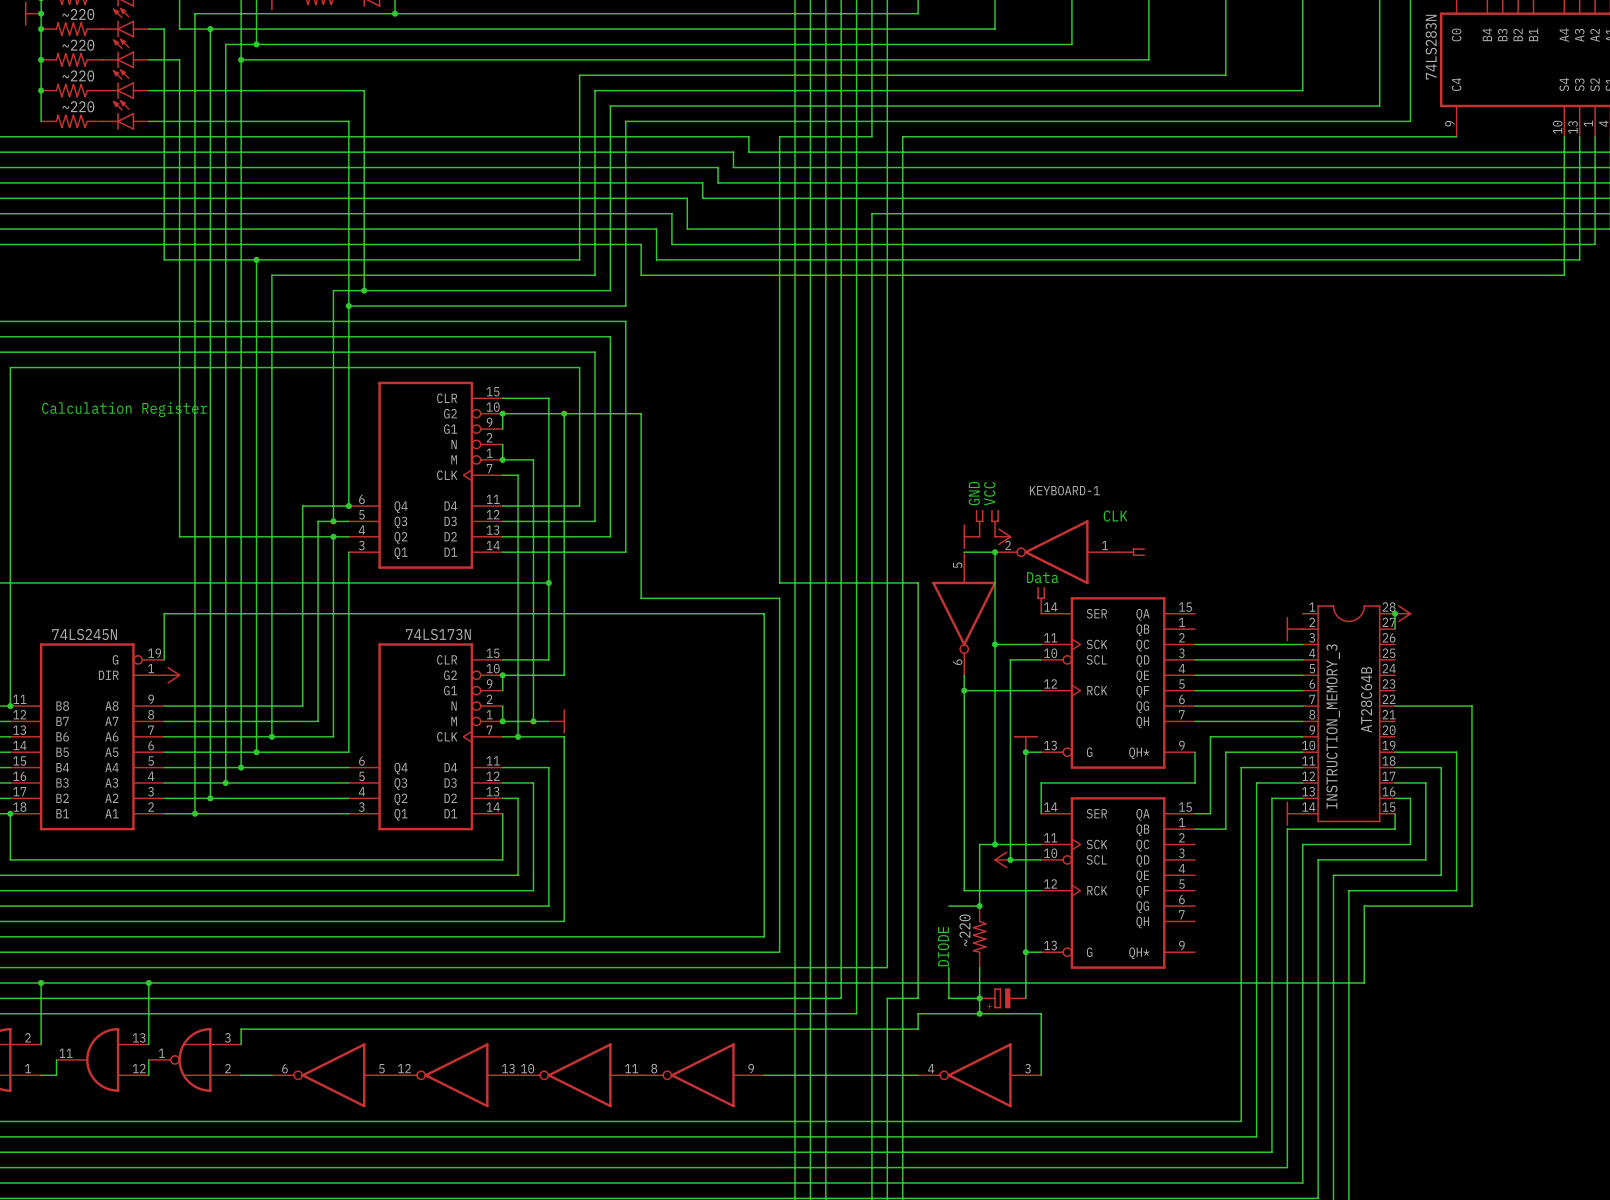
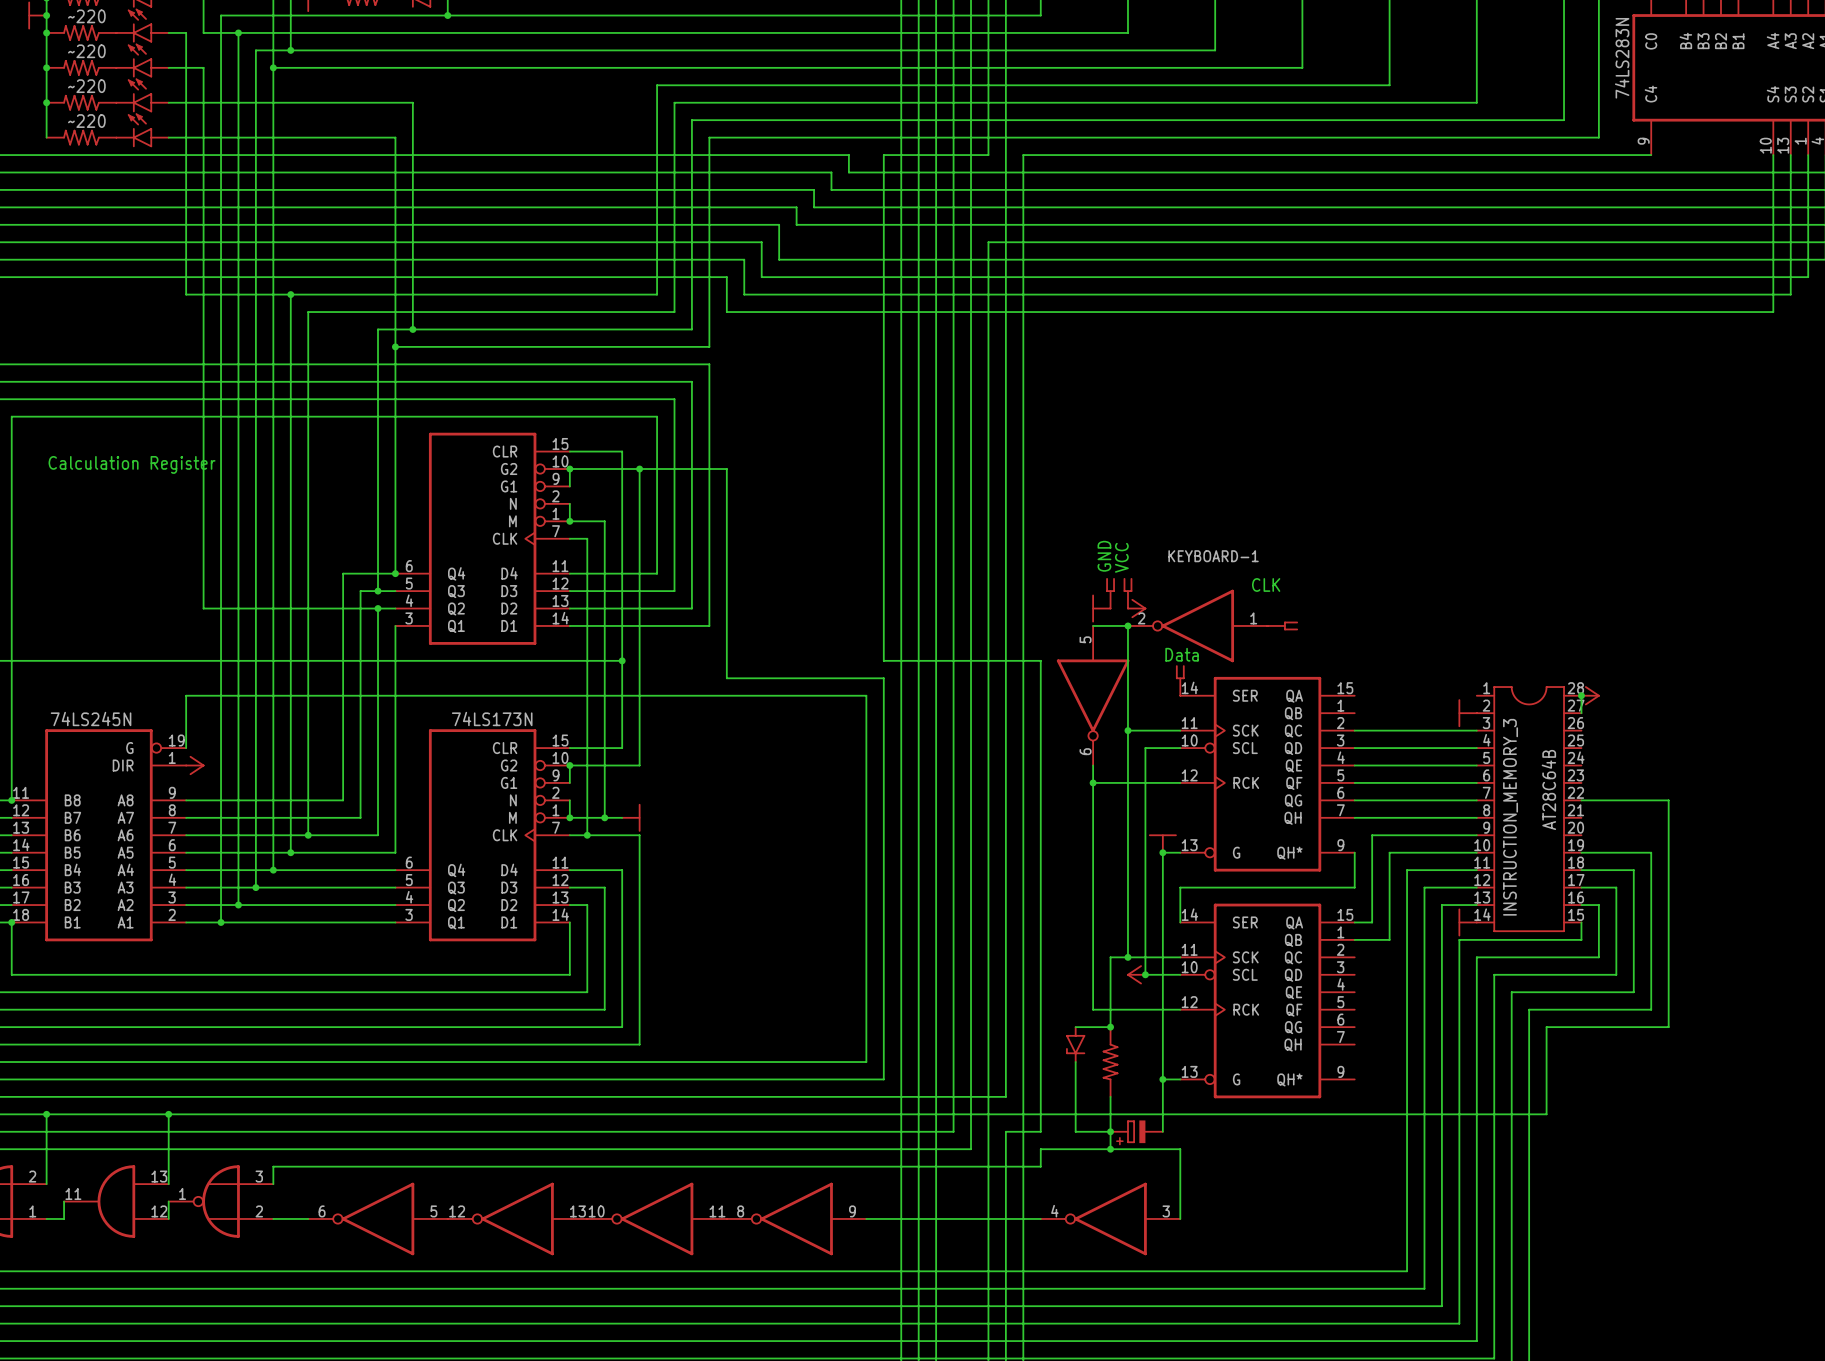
part: none -> (1075, 1044)
part value: ~220 (965, 930) -> none
wire: none -> (1075, 1062) (1075, 1096)
text: DIODE (943, 946) -> none

